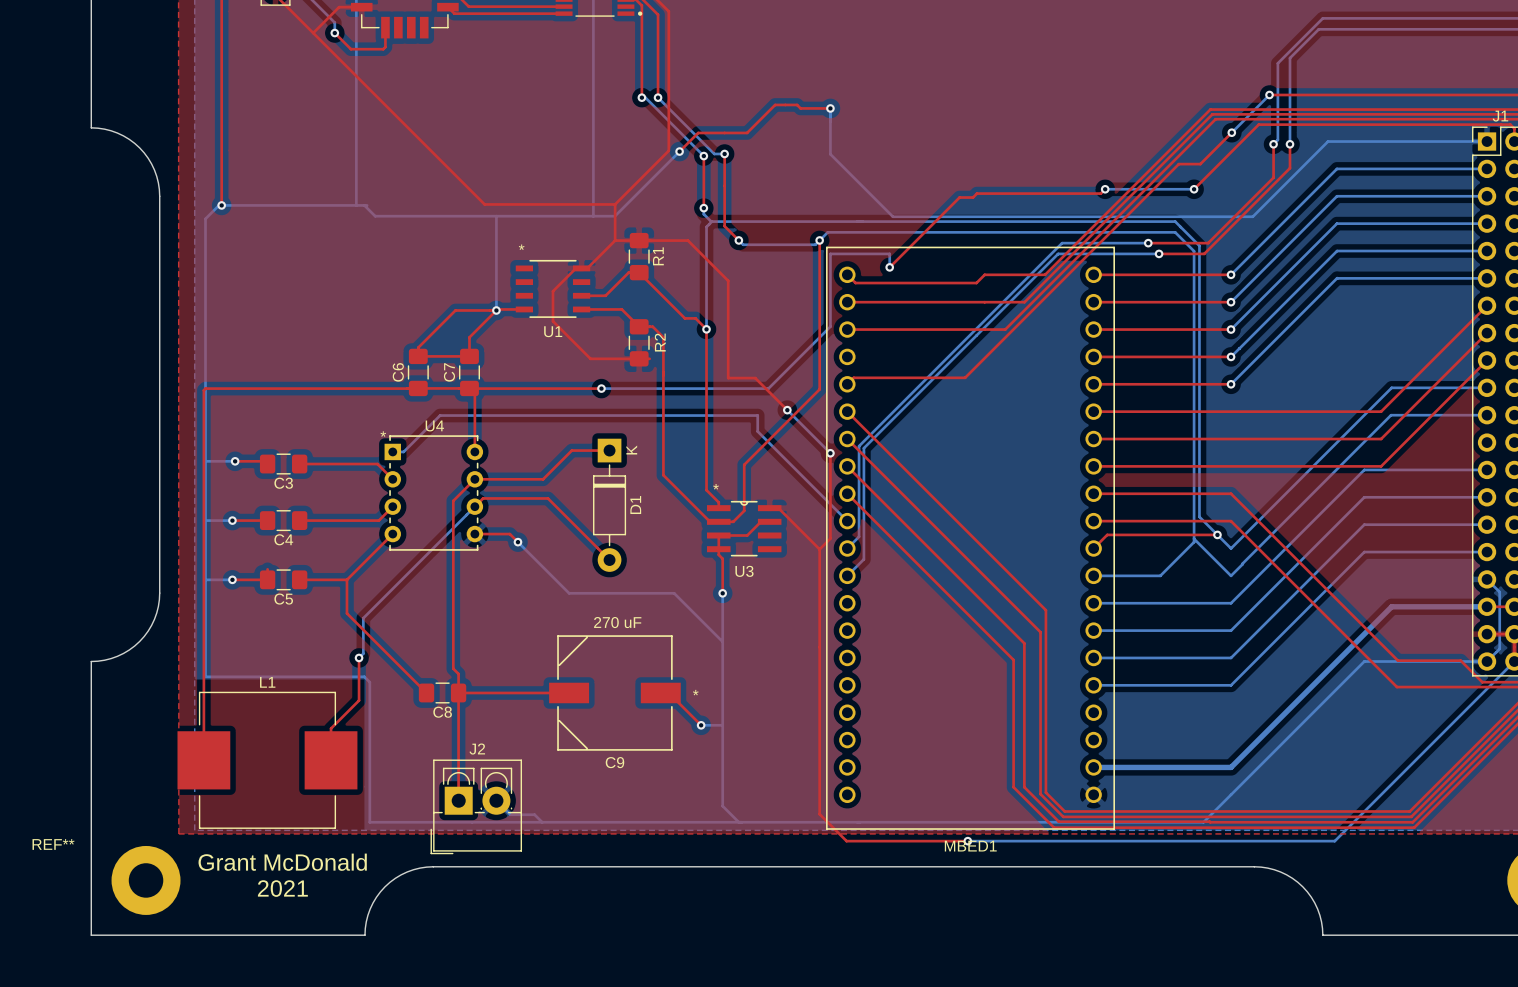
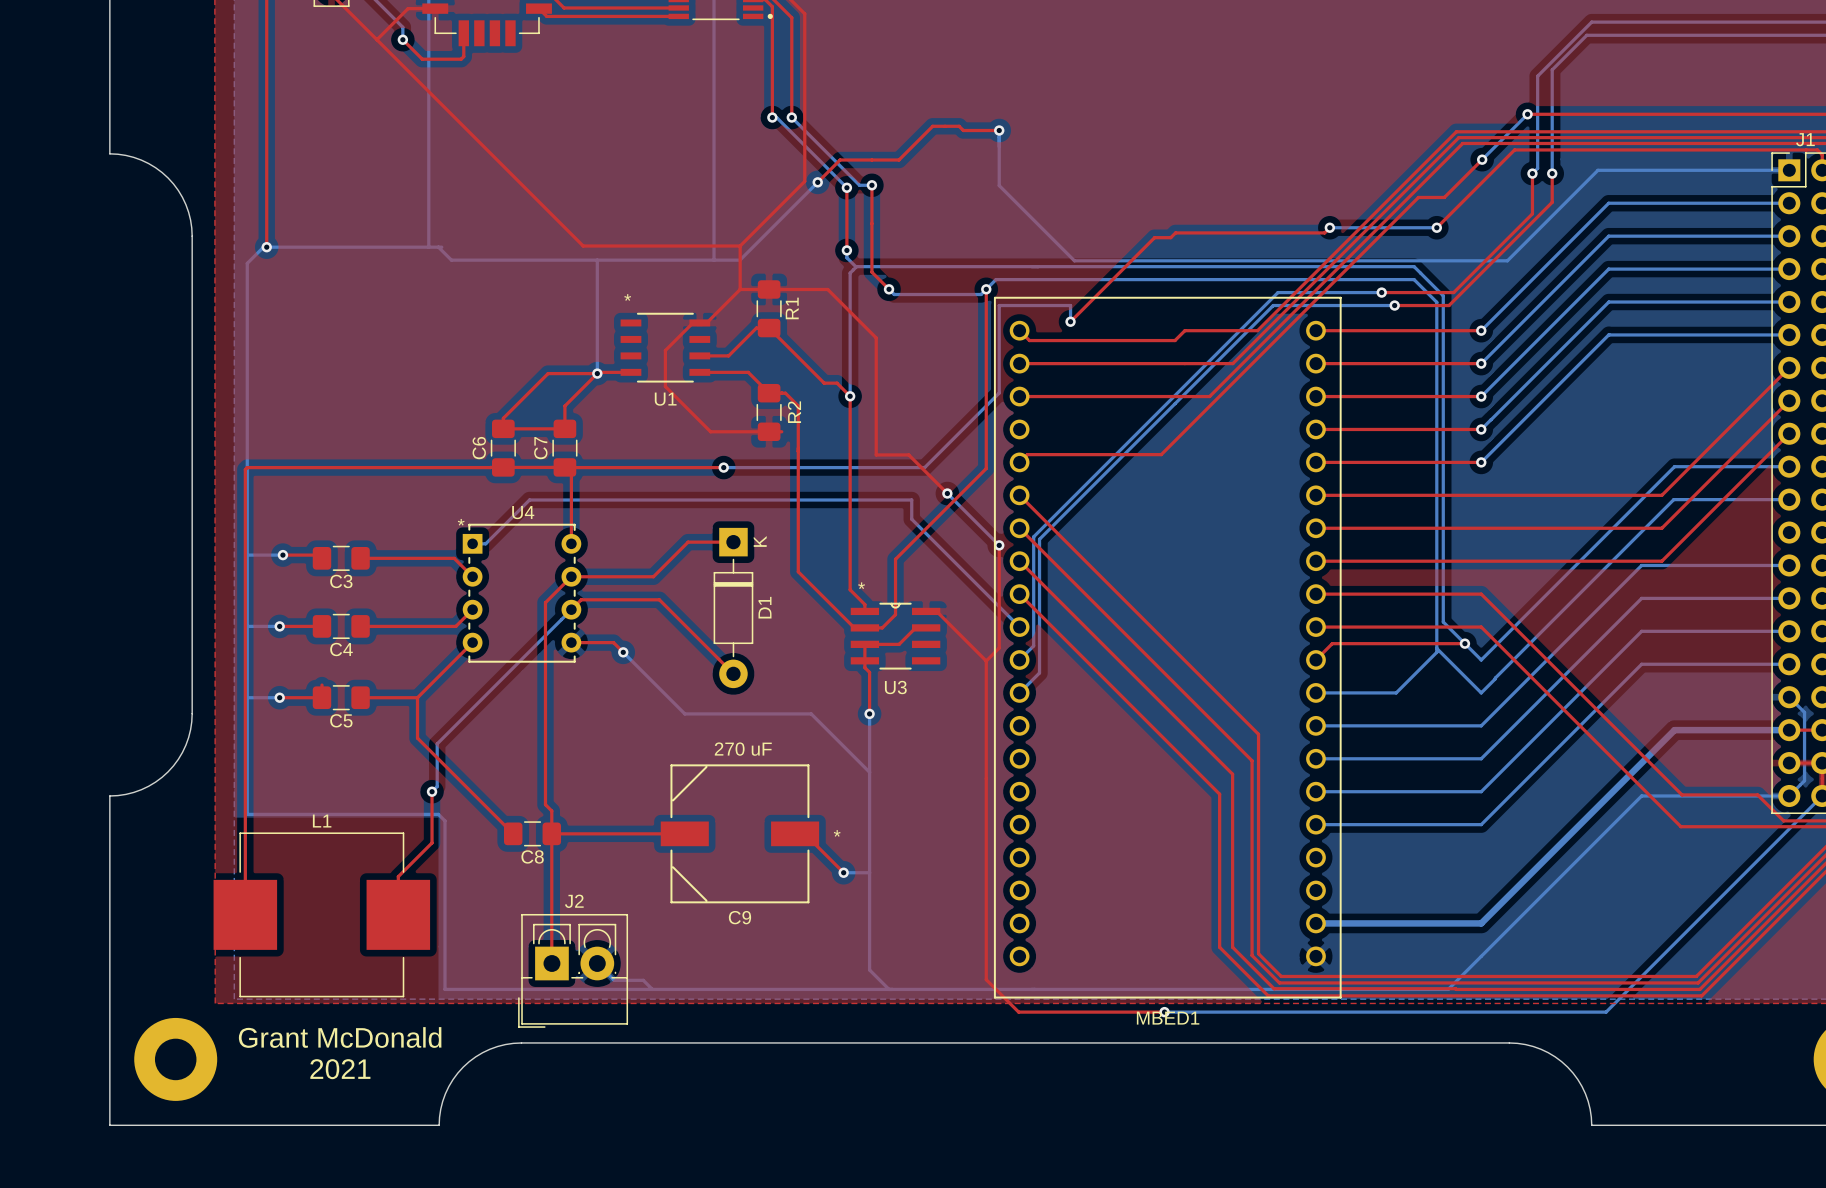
REF** name: REF** (53, 844) -> none

